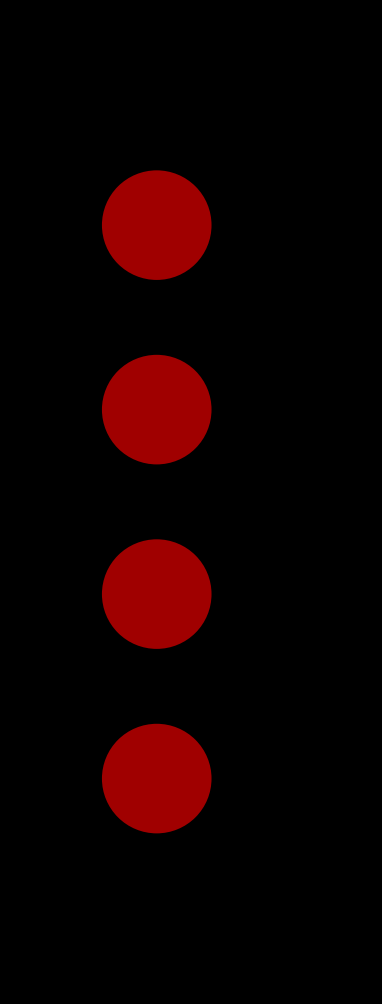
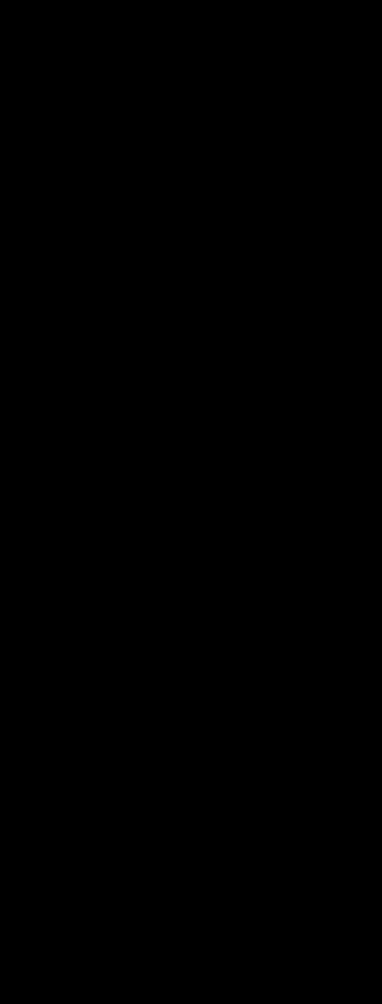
part: (156, 225) -> none
part: (156, 409) -> none
part: (156, 594) -> none
part: (156, 778) -> none

